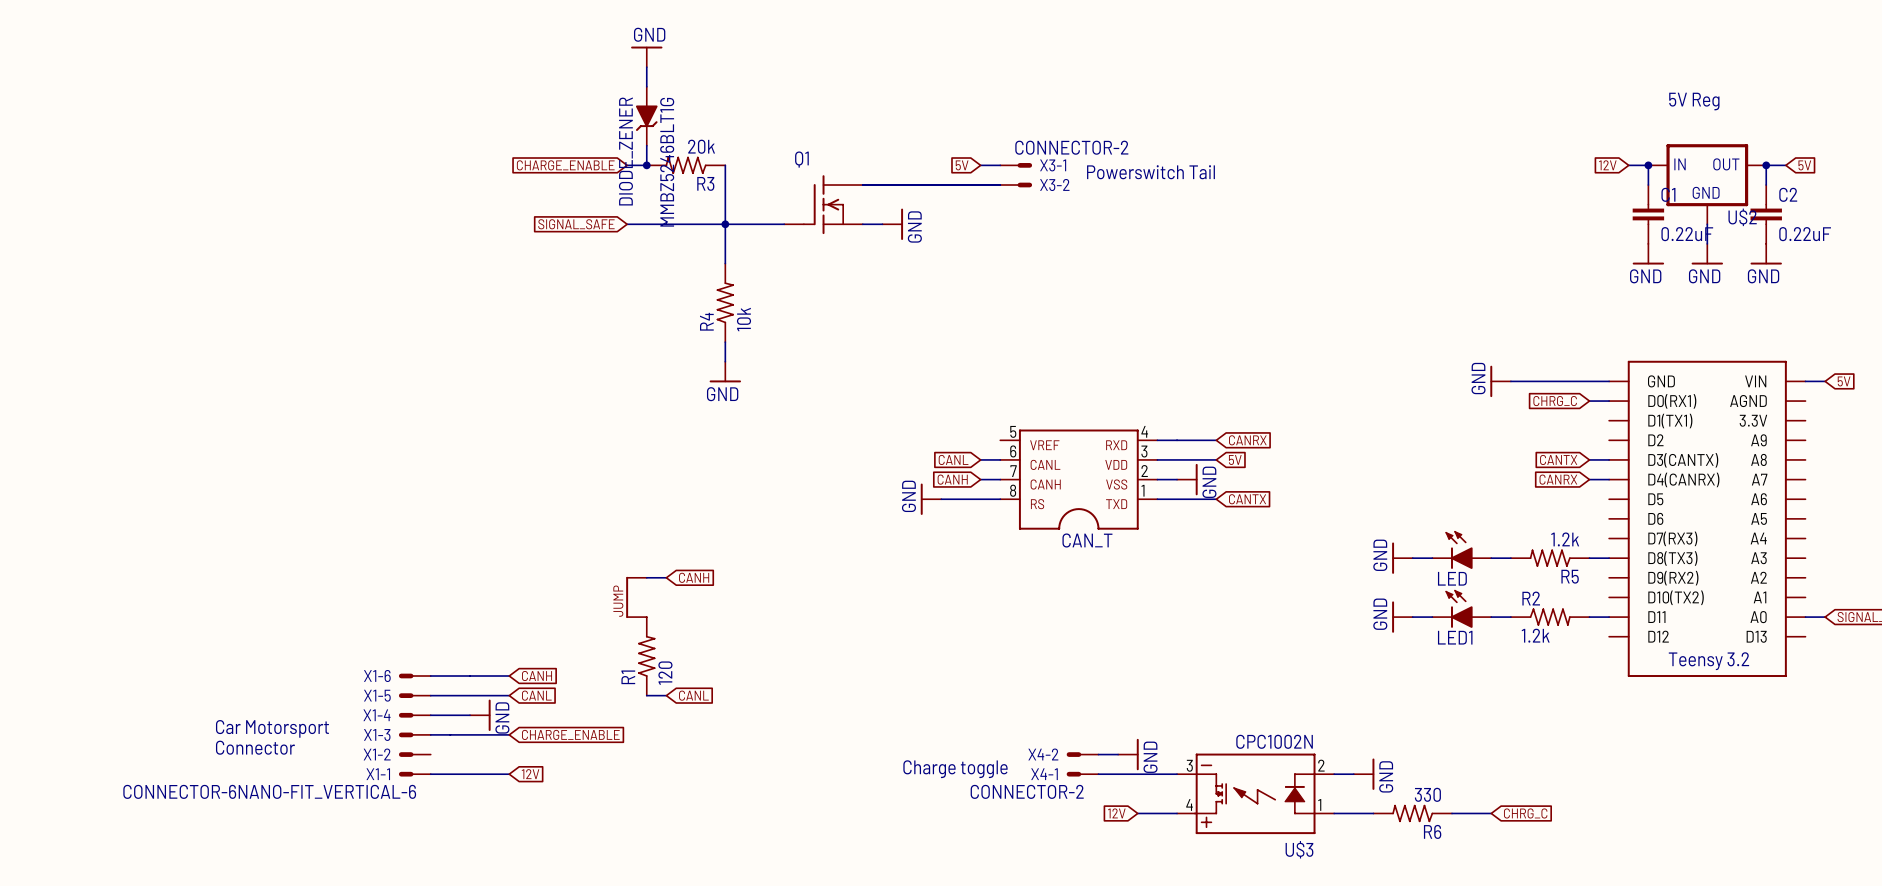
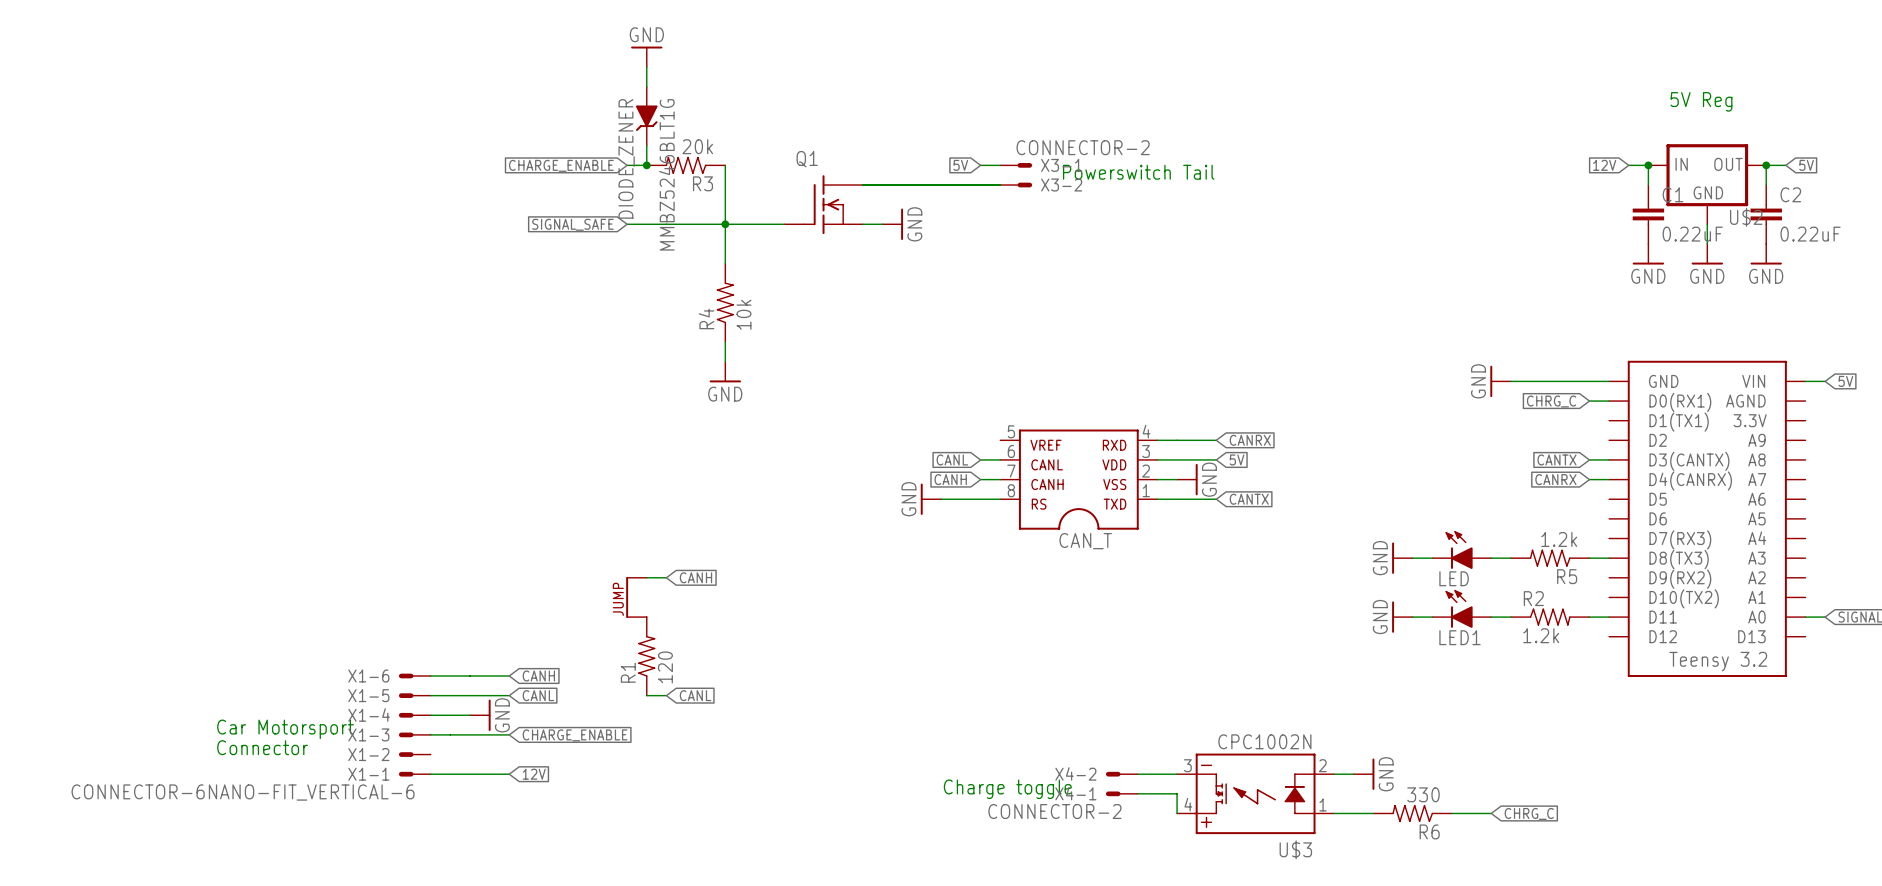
X4-2 position: (1082, 754) -> (1121, 774)
wire: (1098, 754) (1118, 754) -> none
power symbol: GND (1128, 754) -> none
text position: Charge toggle (955, 769) -> Charge toggle (1007, 789)
X4-1 position: (1082, 774) -> (1121, 793)
global label: 12V (1116, 813) -> none
wire: (1137, 813) (1177, 813) -> (1137, 793) (1177, 793) (1177, 813)

